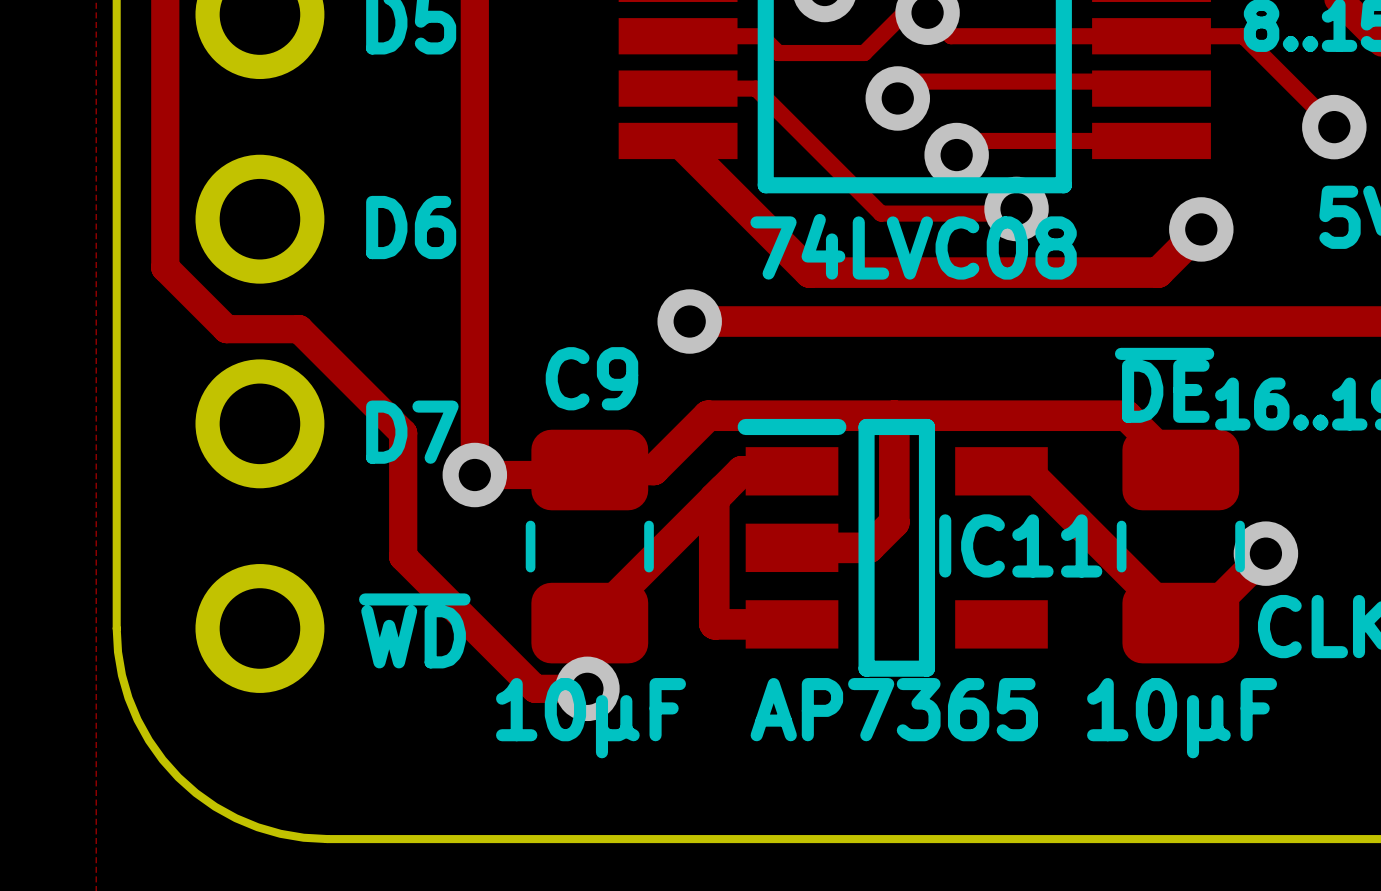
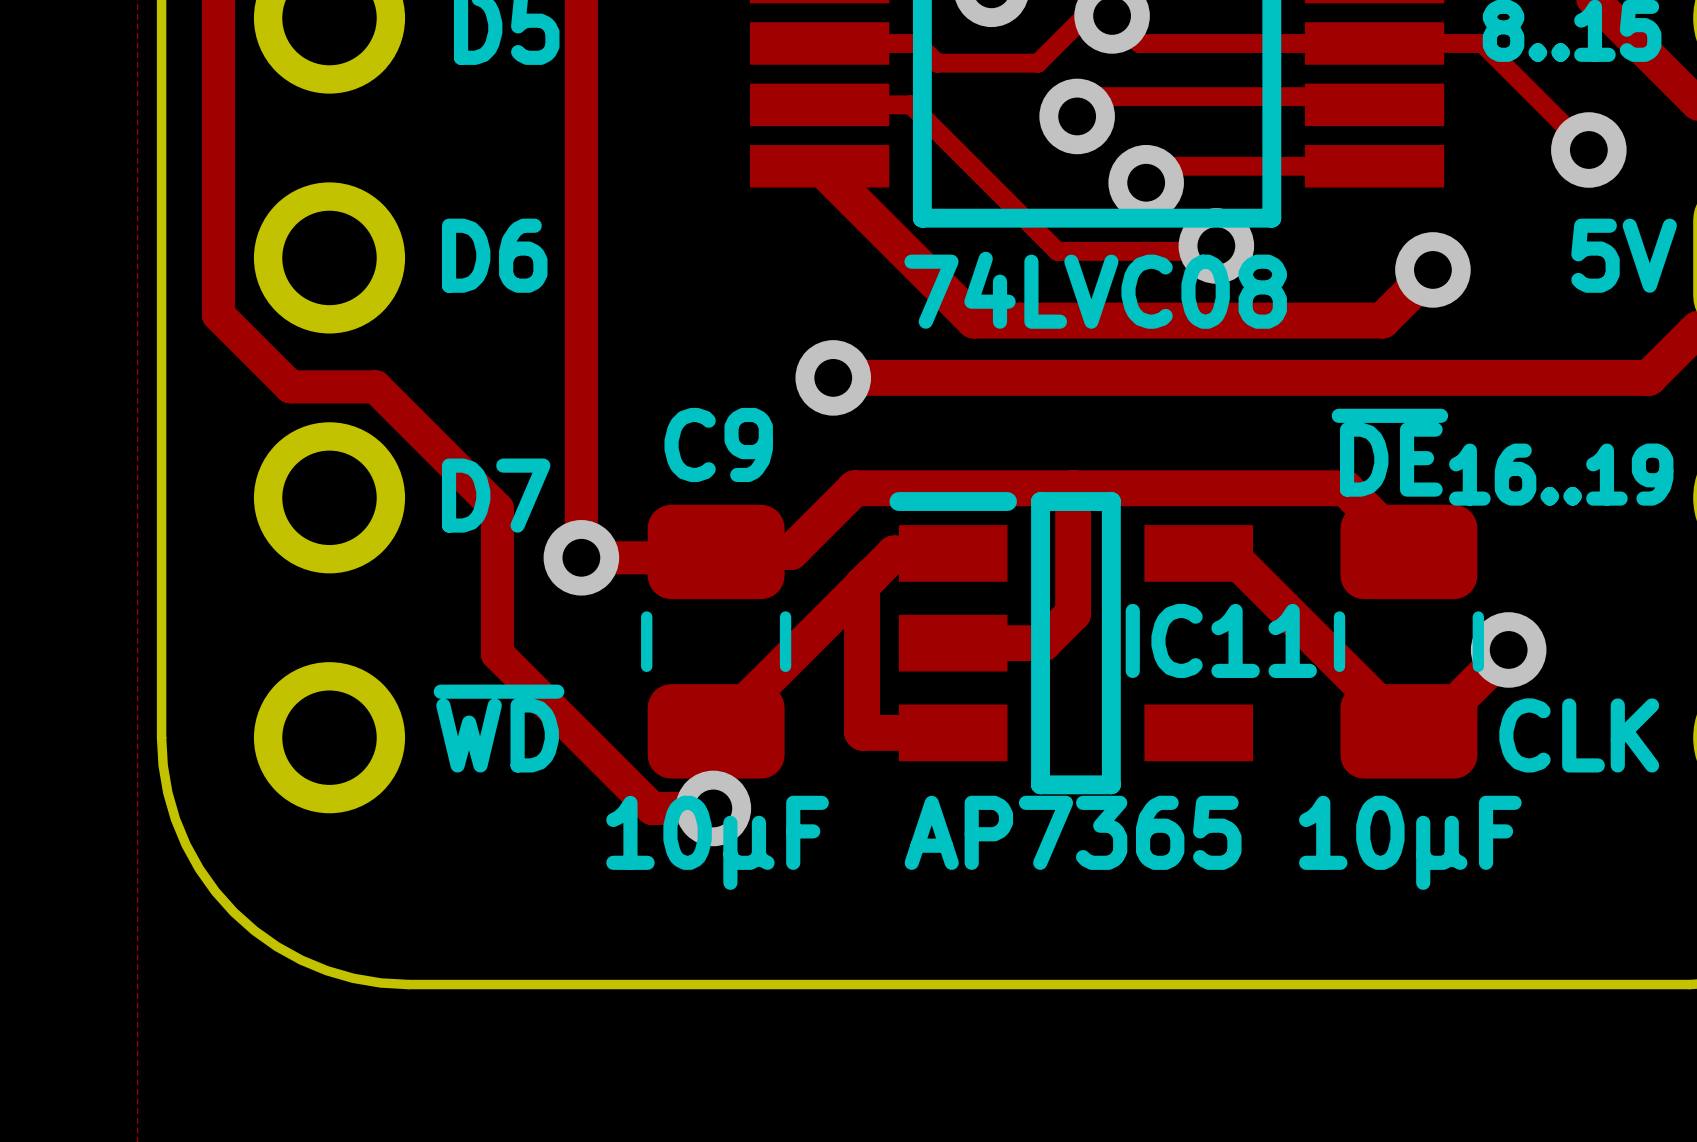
text position: D6 (411, 227) -> D6 (494, 255)
text position: D7 (412, 432) -> D7 (496, 495)
text position: ~{WD} (414, 630) -> ~{WD} (499, 728)

